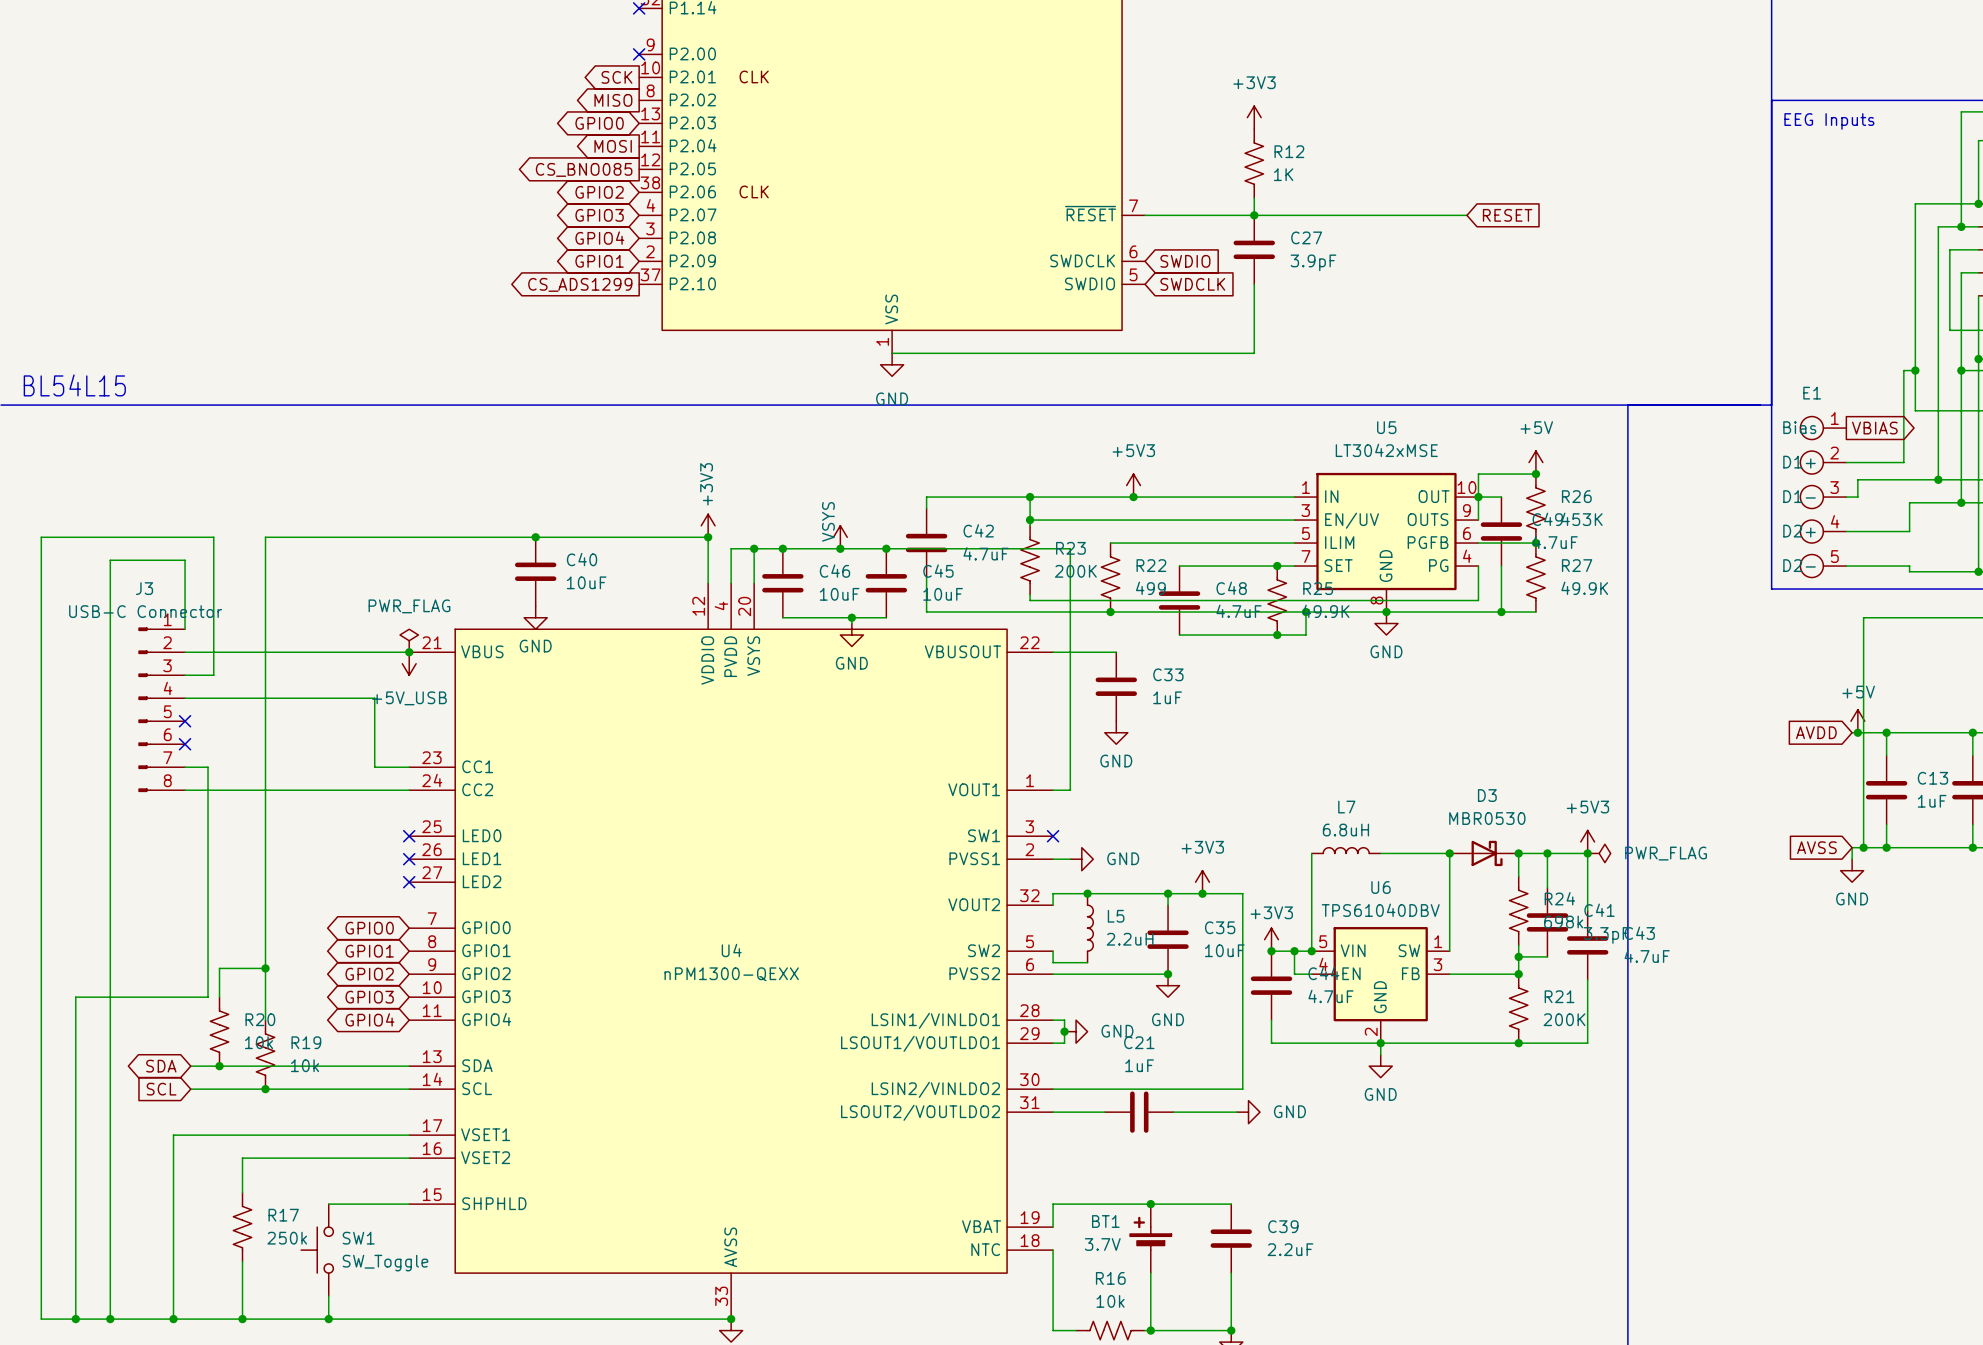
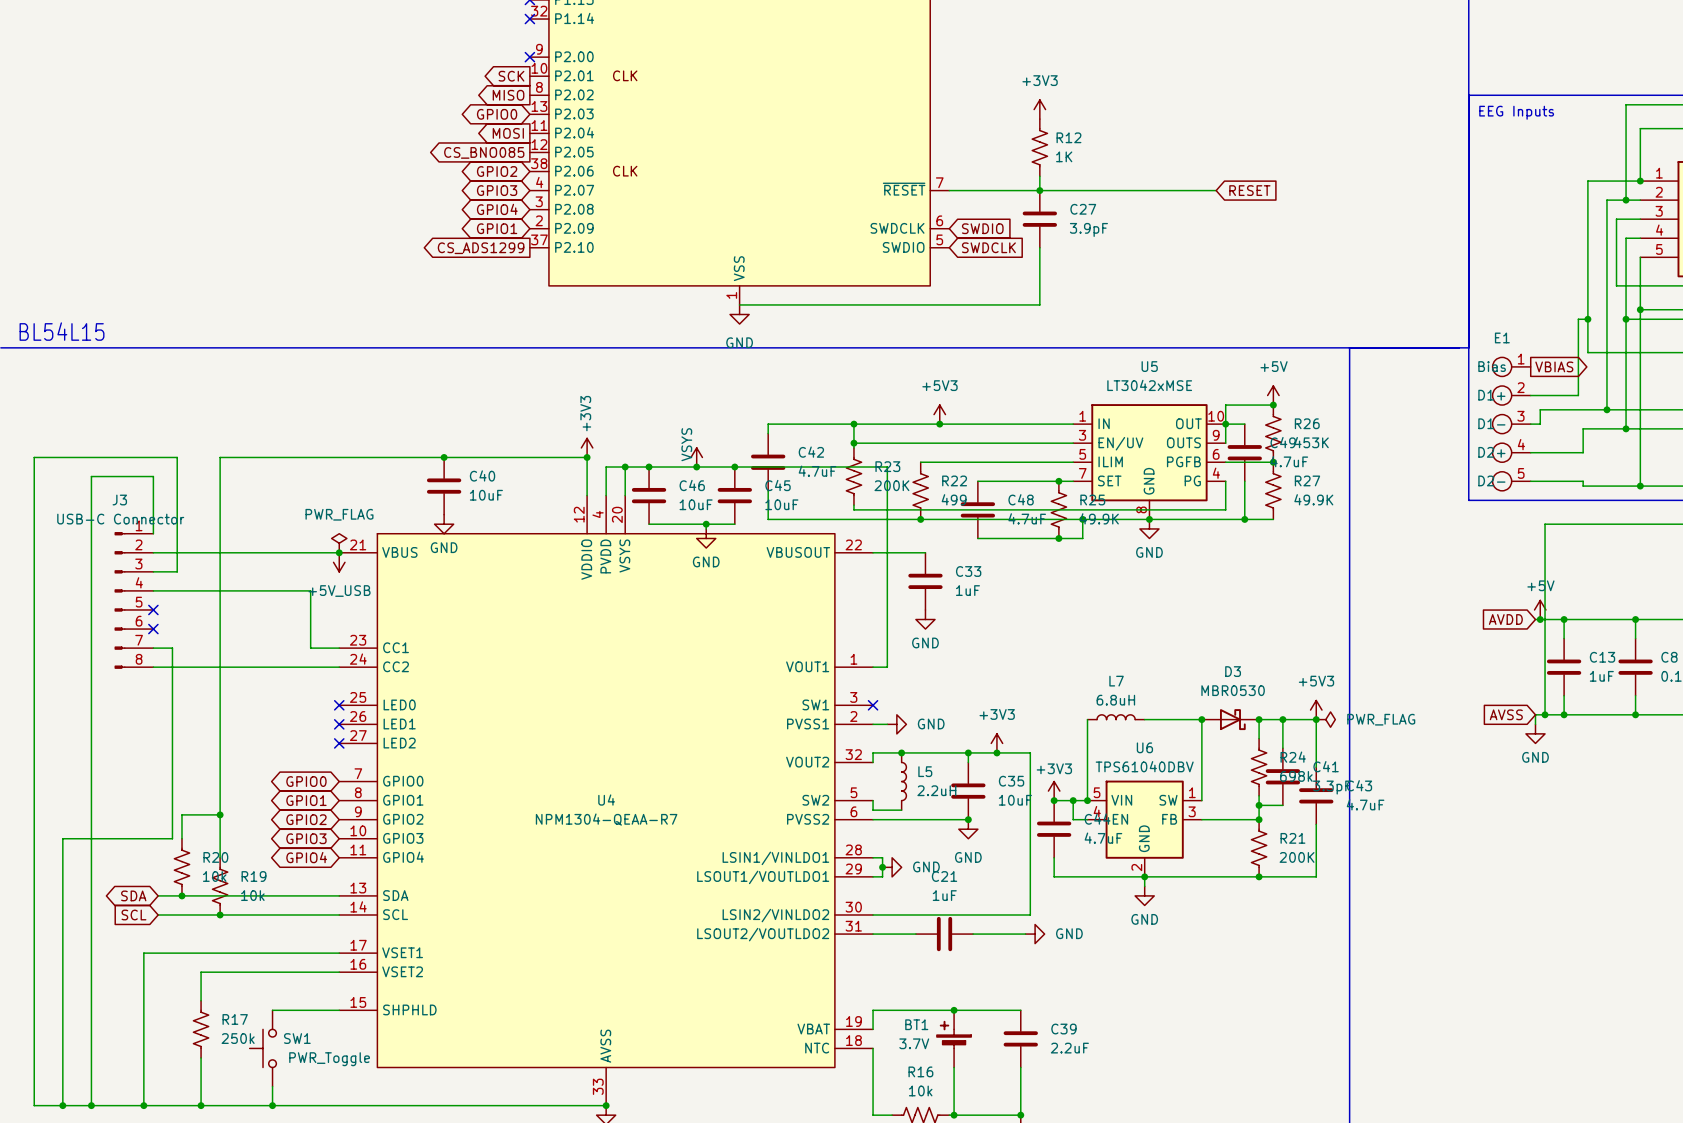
U4 value: nPM1300-QEXX (731, 974) -> NPM1304-QEAA-R7 (606, 819)
SW1 value: SW_Toggle (385, 1263) -> PWR_Toggle (329, 1059)

